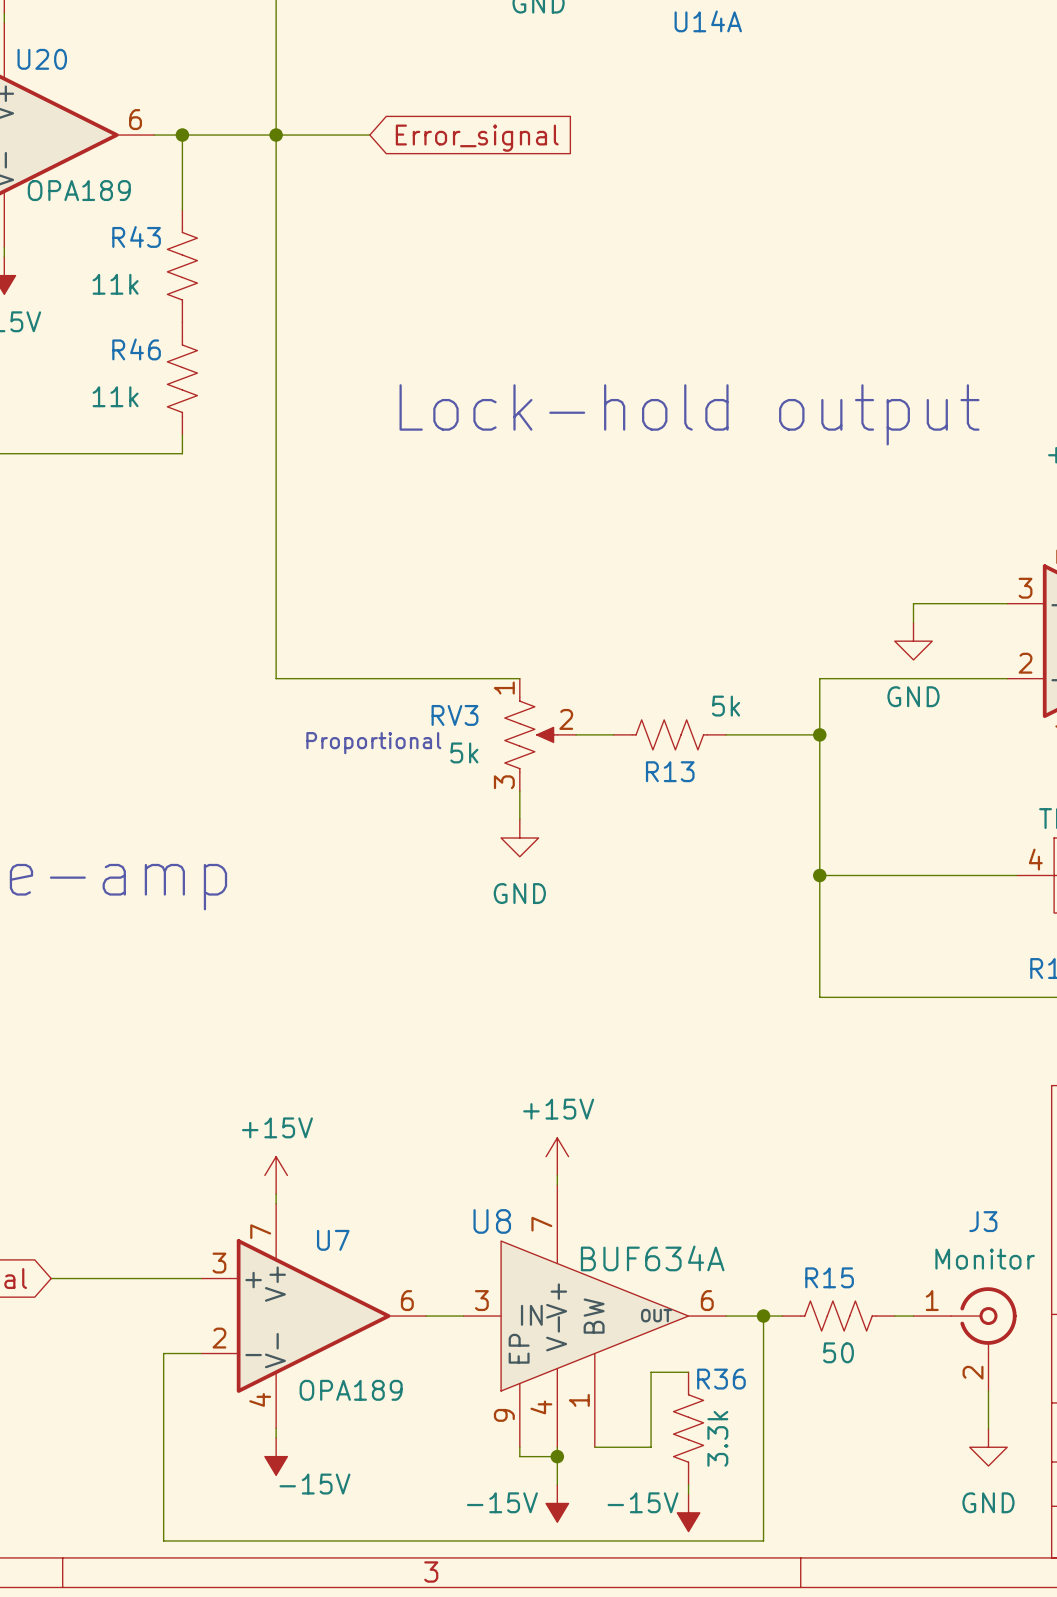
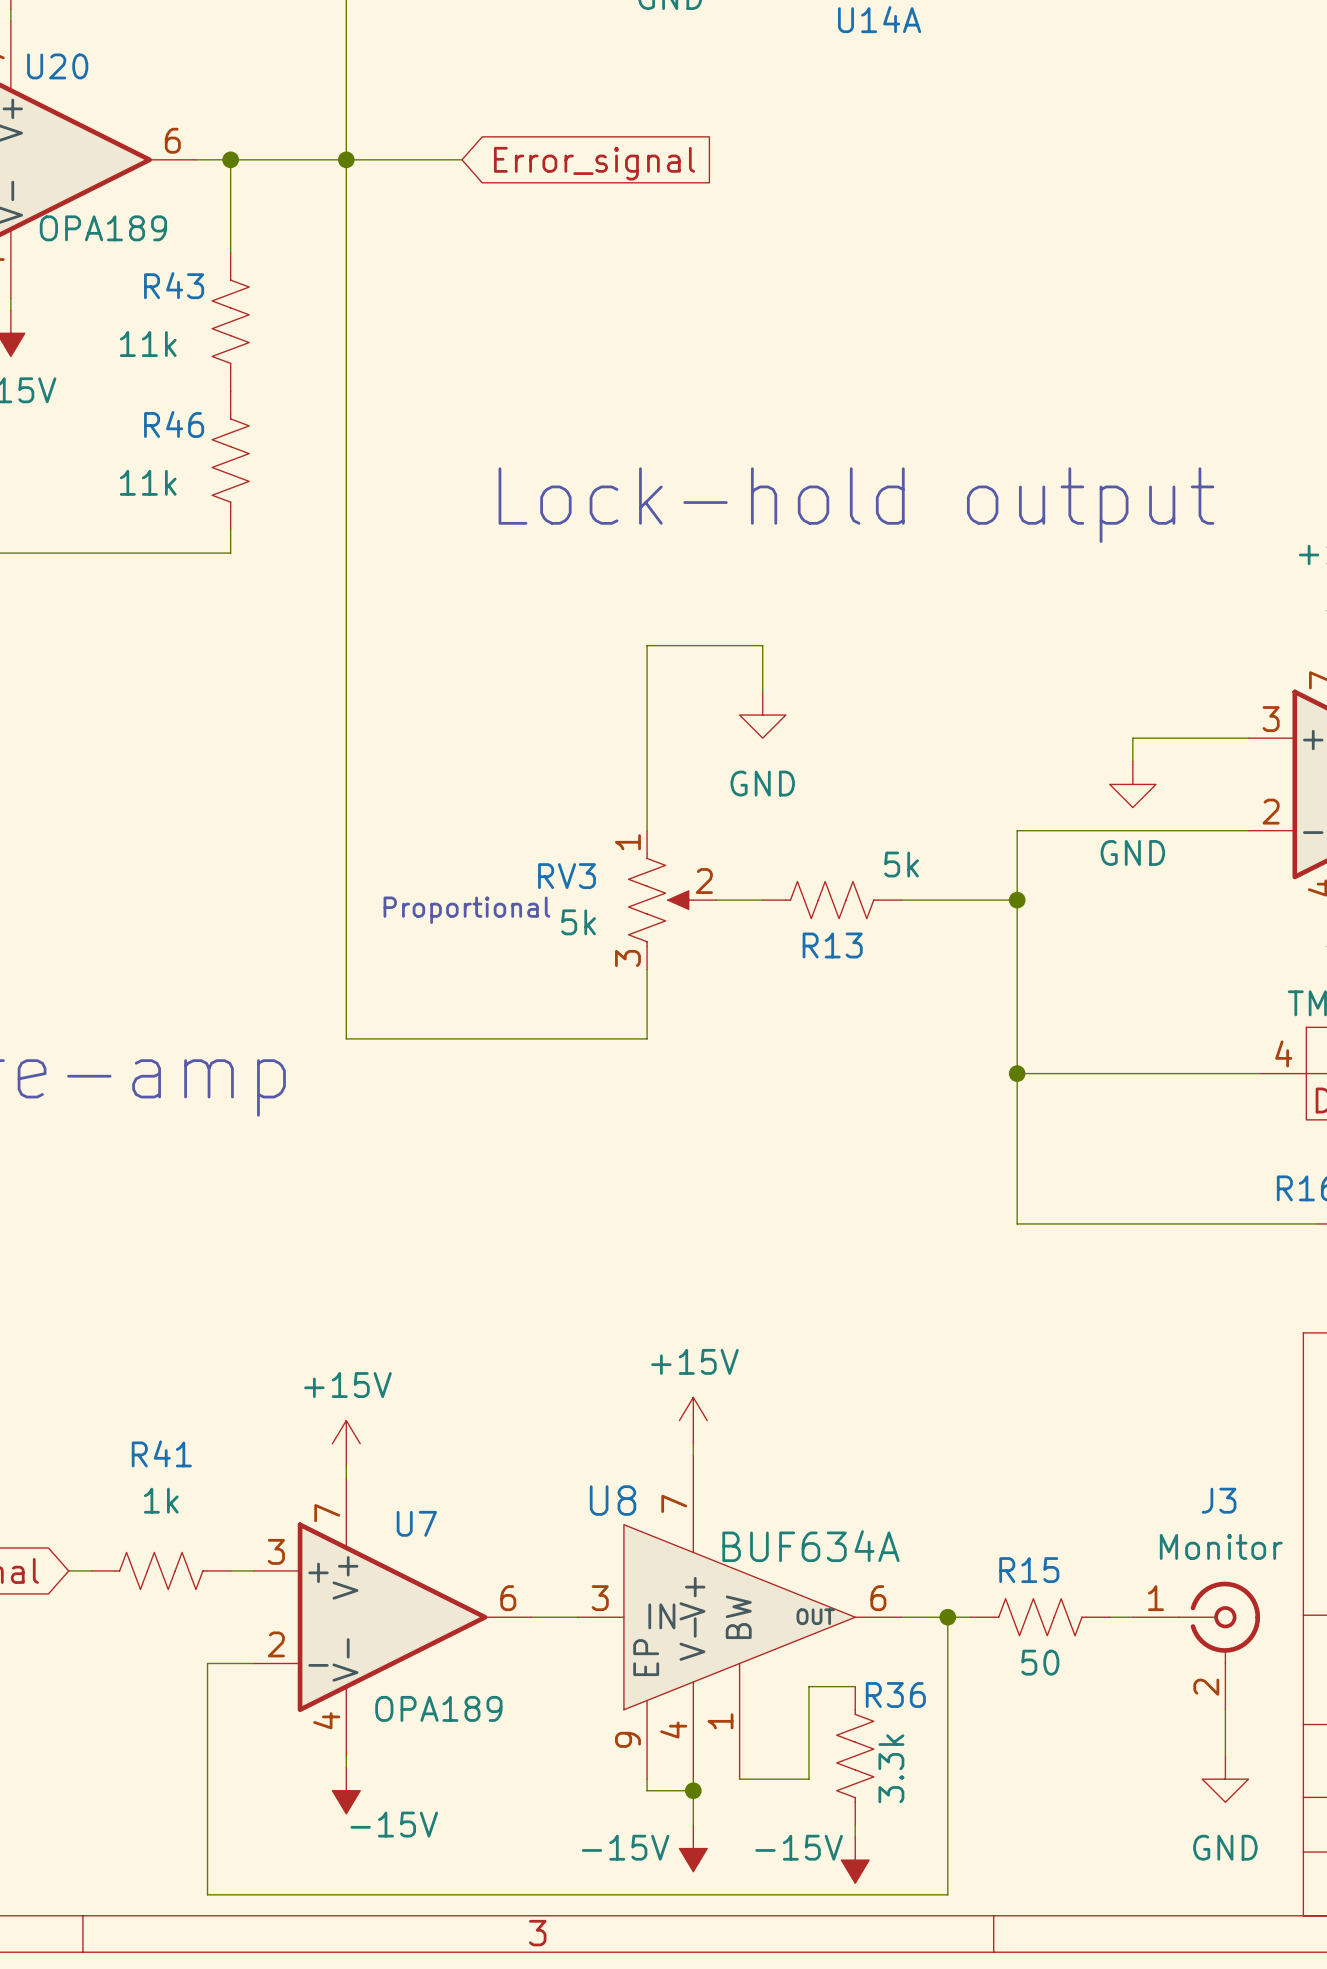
wire: none -> (762, 691) (762, 645) (647, 645) (647, 830)
wire: (276, 678) (519, 678) -> (346, 830) (346, 1038) (647, 1038) (647, 1004)
power symbol position: GND (519, 838) -> GND (762, 715)
wire: (69, 1278) (182, 1278) -> none
R41: none -> 1k (161, 1570)

